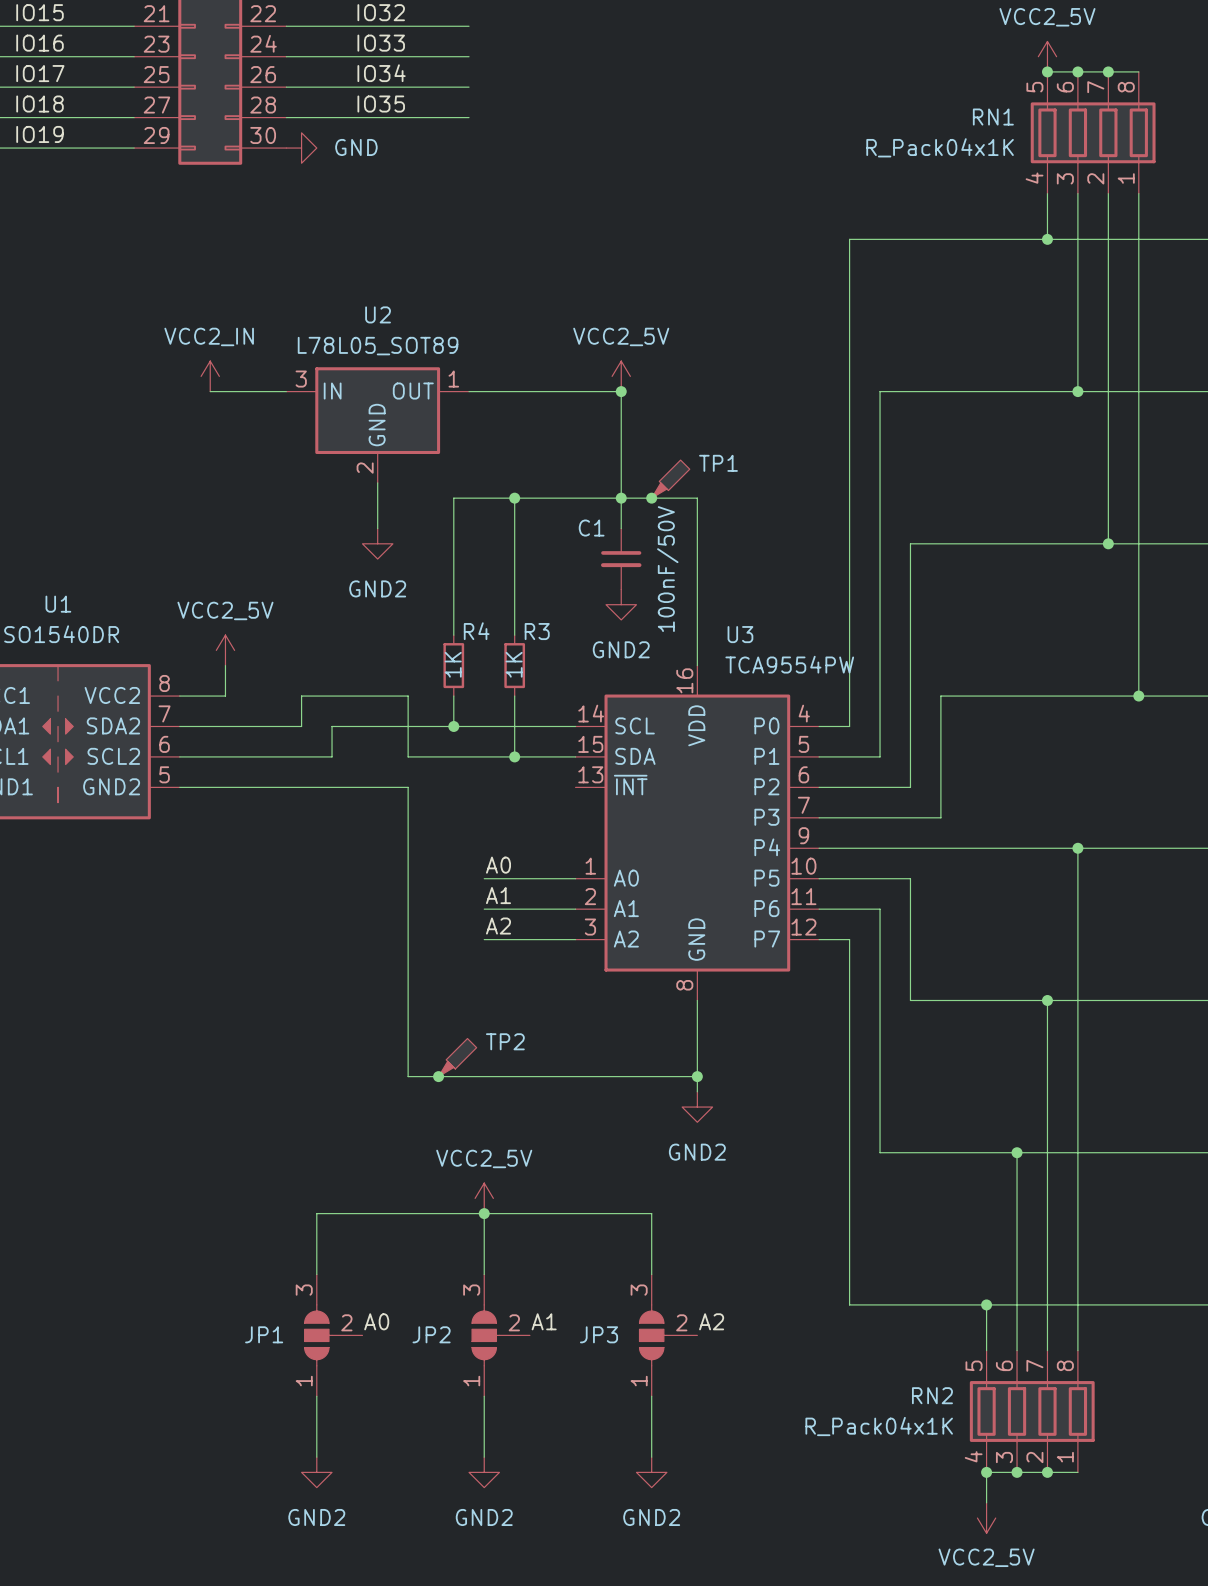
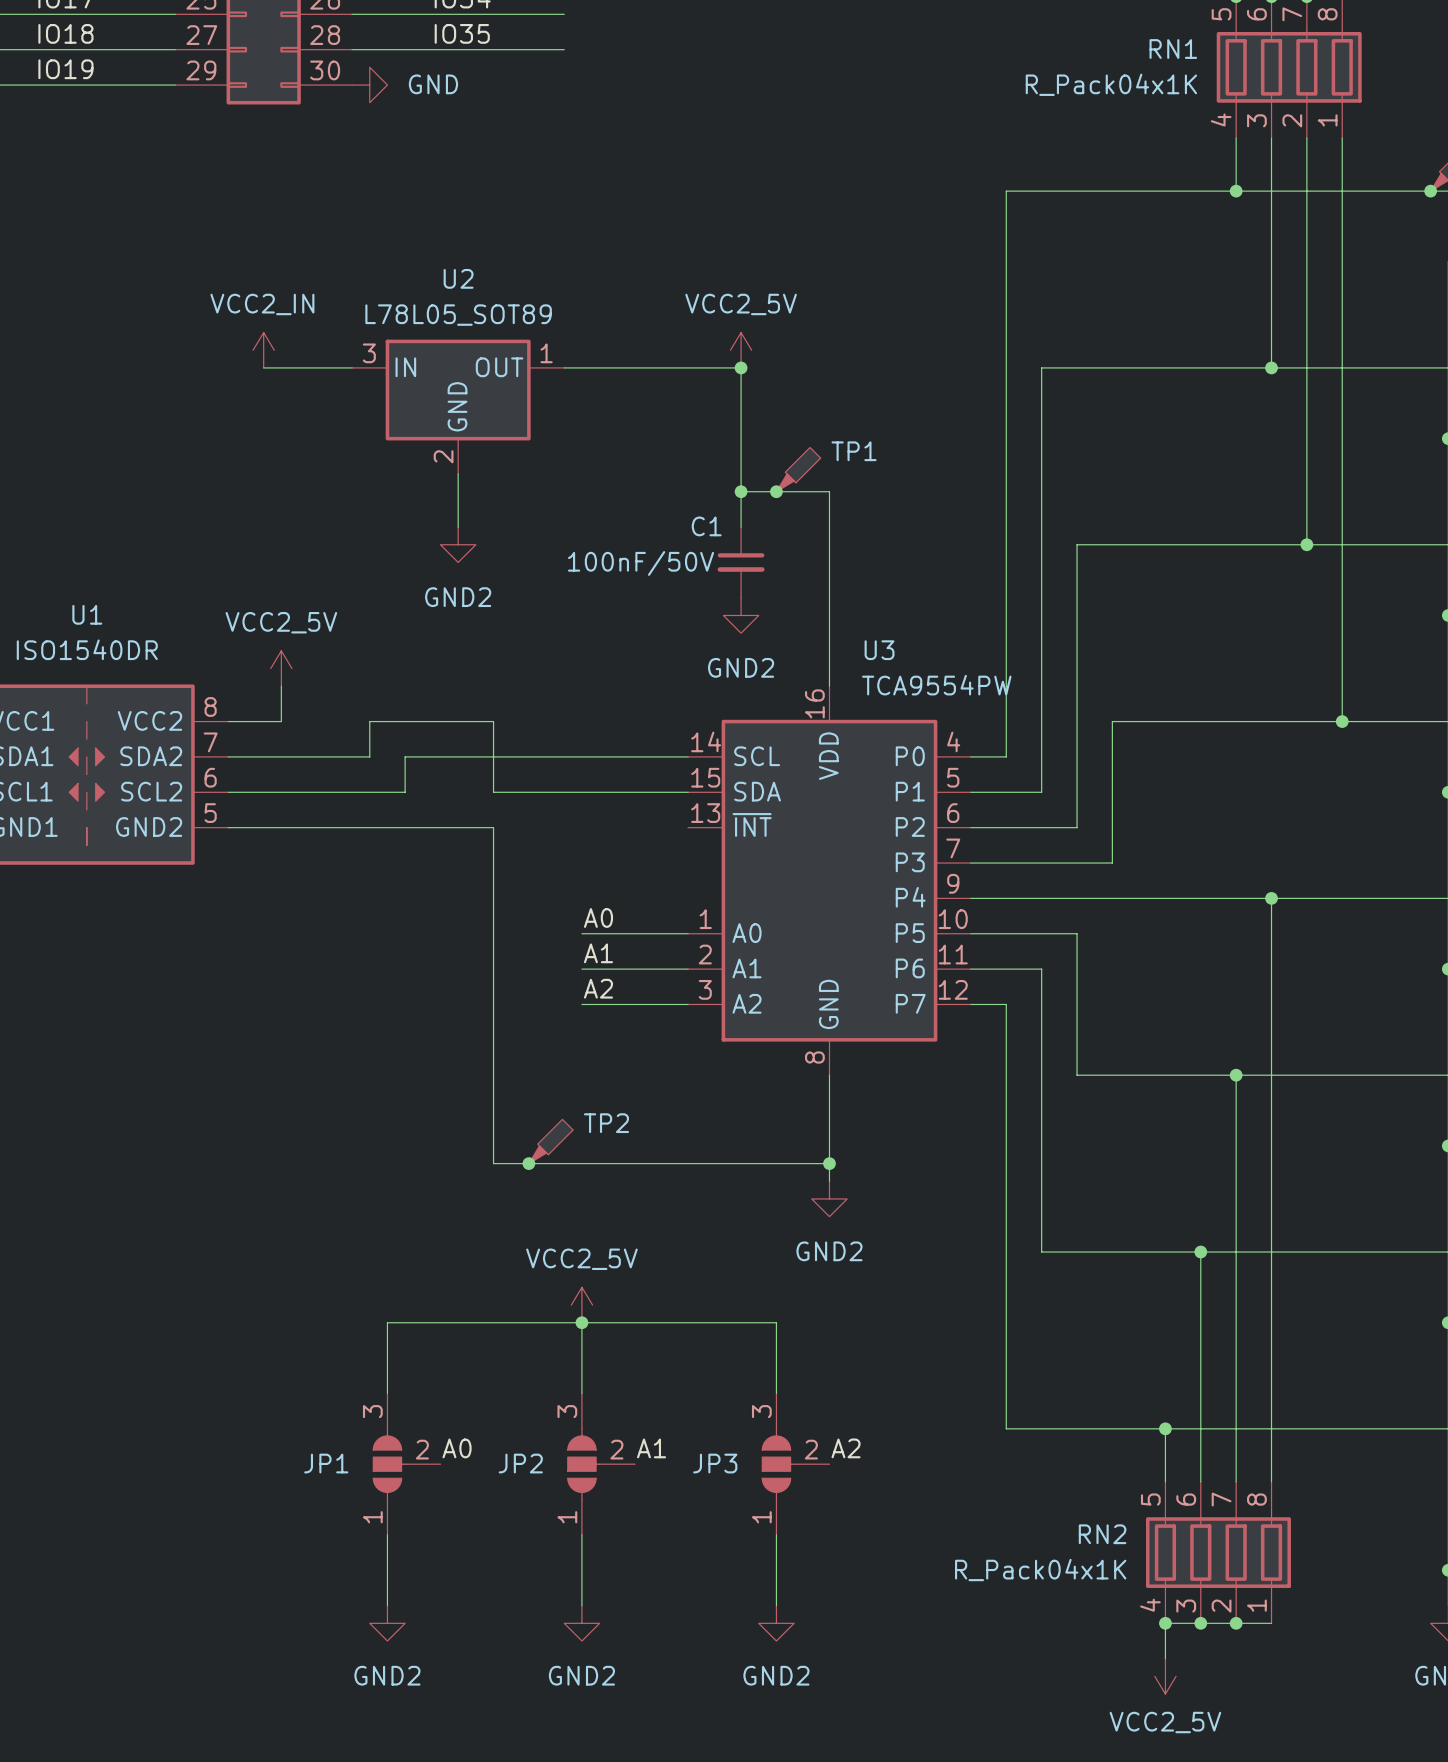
wire: (514, 498) (514, 635) -> none
junction: (514, 498) -> none
wire: (621, 498) (453, 498) (453, 635) -> none
C1 value rotation: 0° (667, 569) -> 90° clockwise (641, 563)
R4: 1K (453, 665) -> none
R3: 1K (514, 665) -> none
wire: (453, 696) (453, 726) -> none
wire: (514, 696) (514, 756) -> none
junction: (453, 726) -> none
junction: (514, 756) -> none

